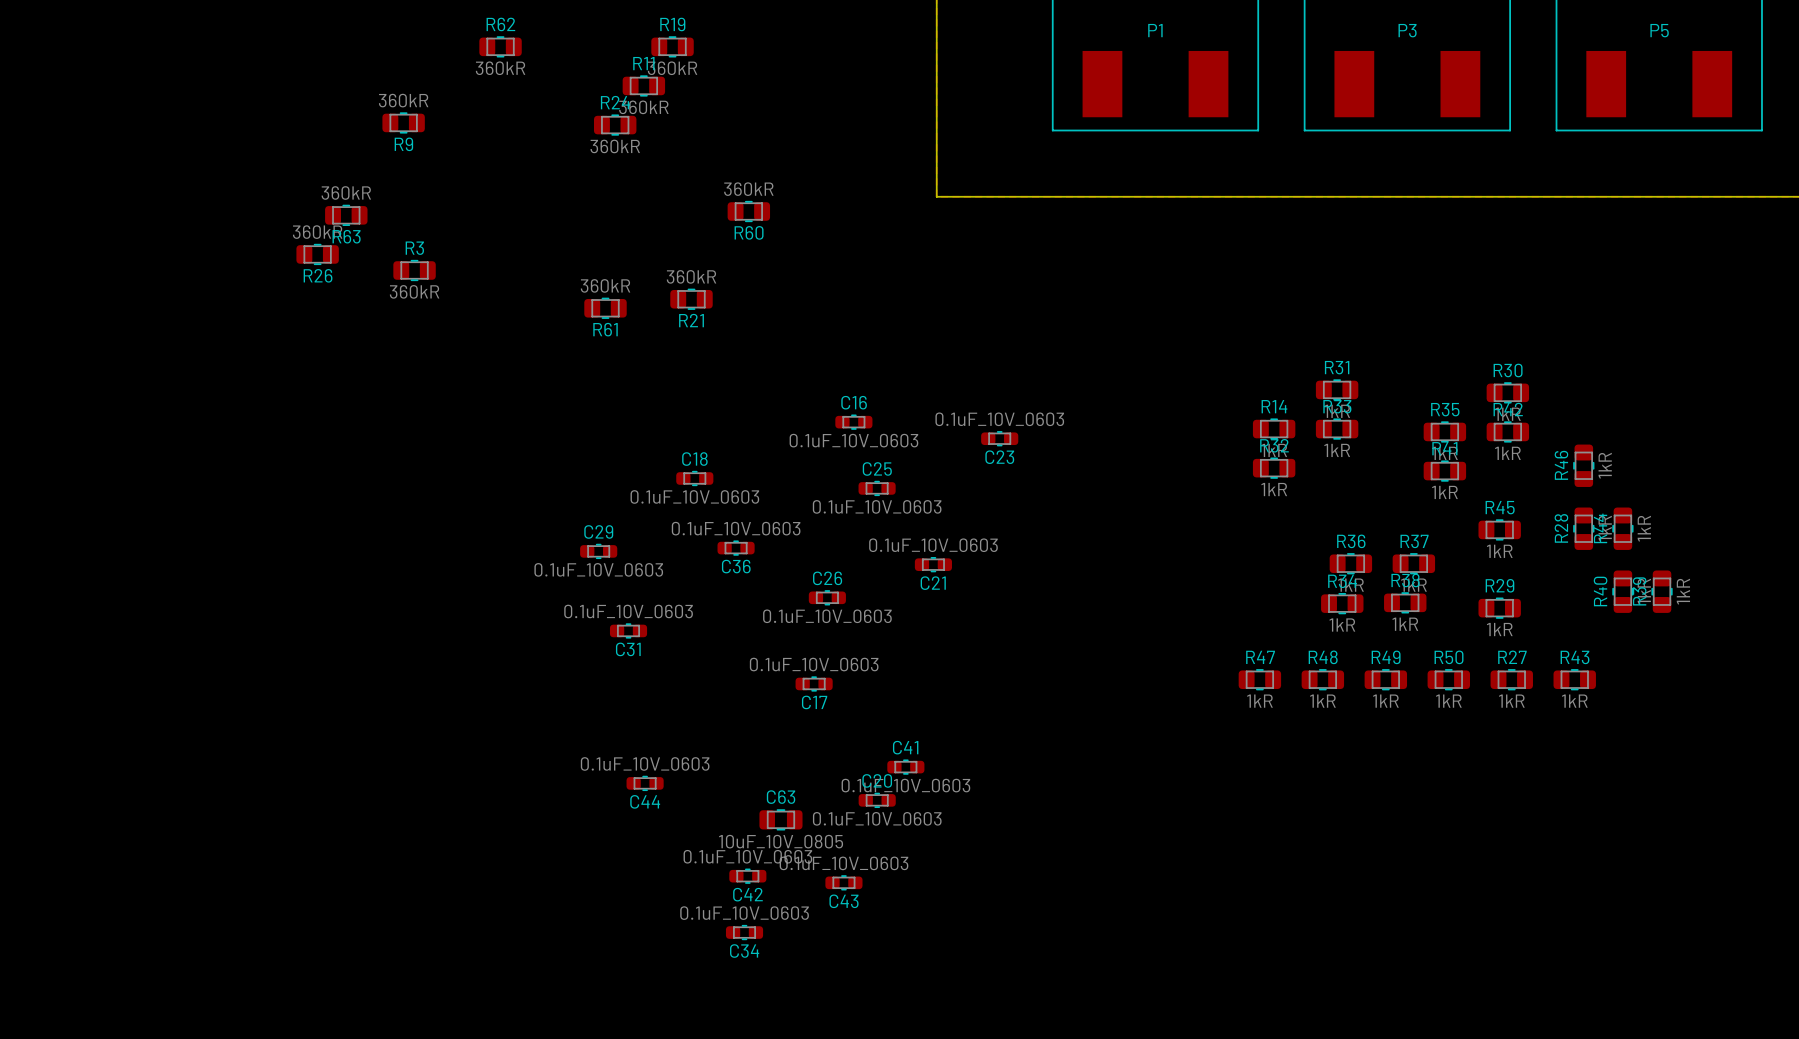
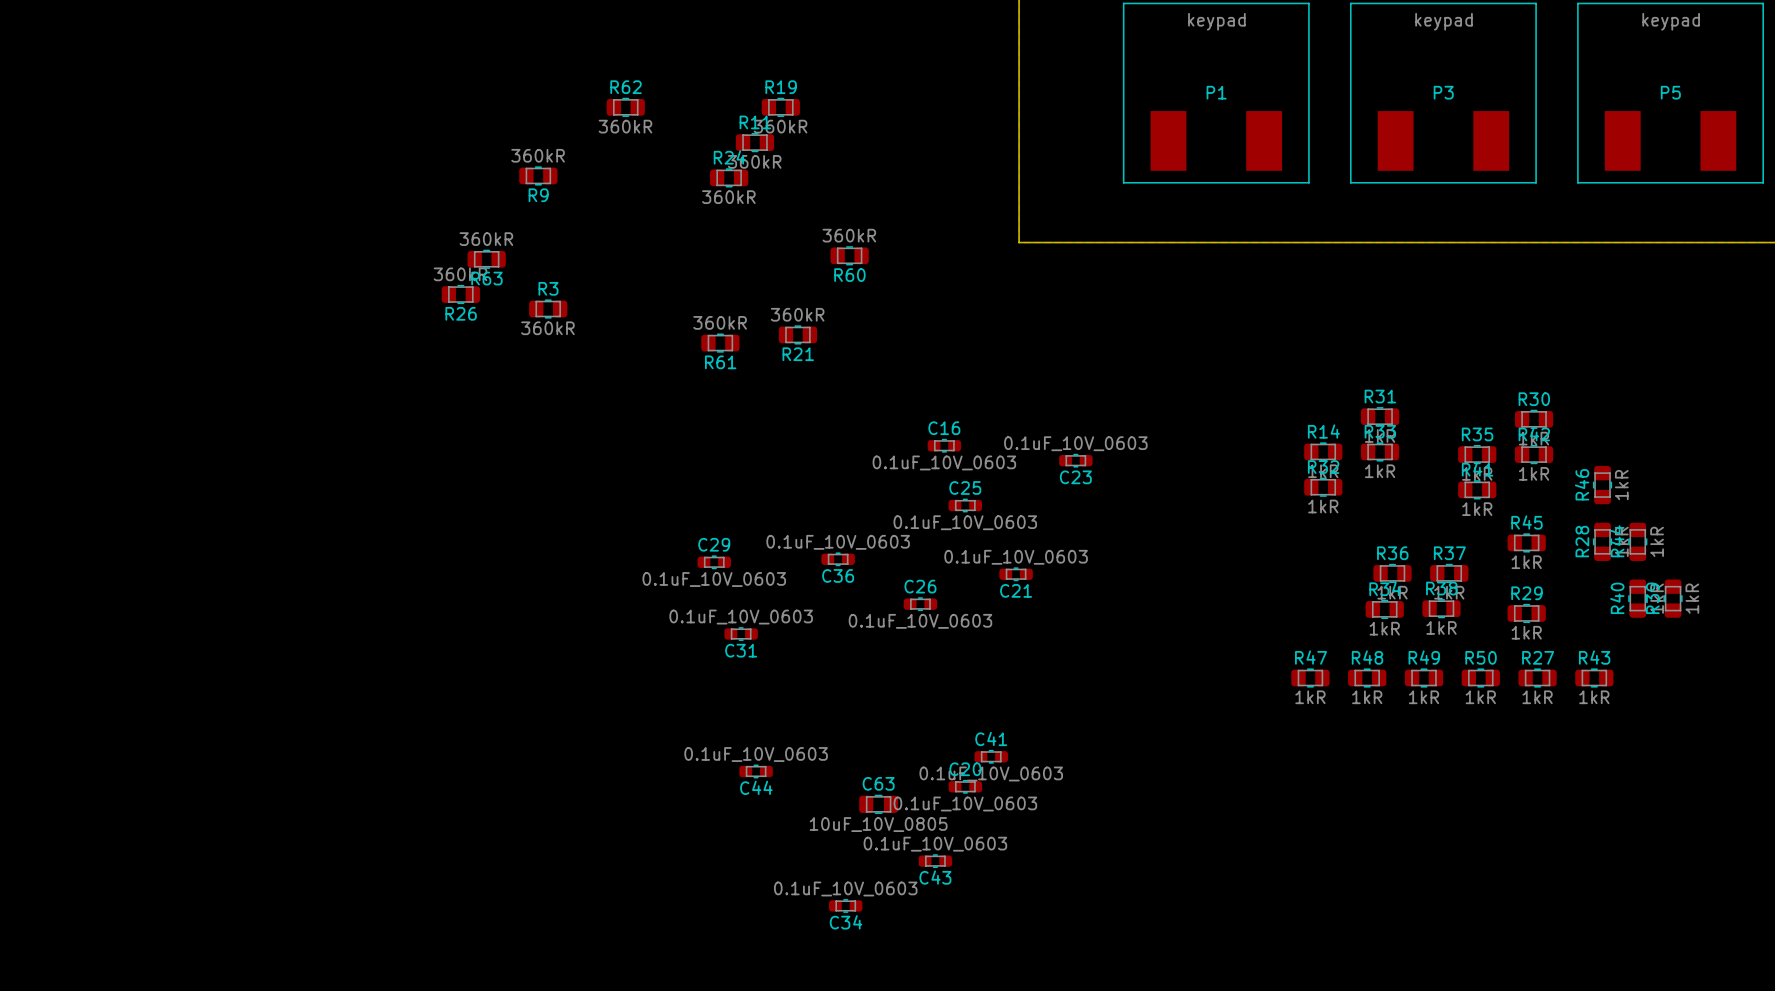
C18: 0.1uF_10V_0603 (694, 478) -> none
C17: 0.1uF_10V_0603 (814, 683) -> none
C42: 0.1uF_10V_0603 (747, 876) -> none

